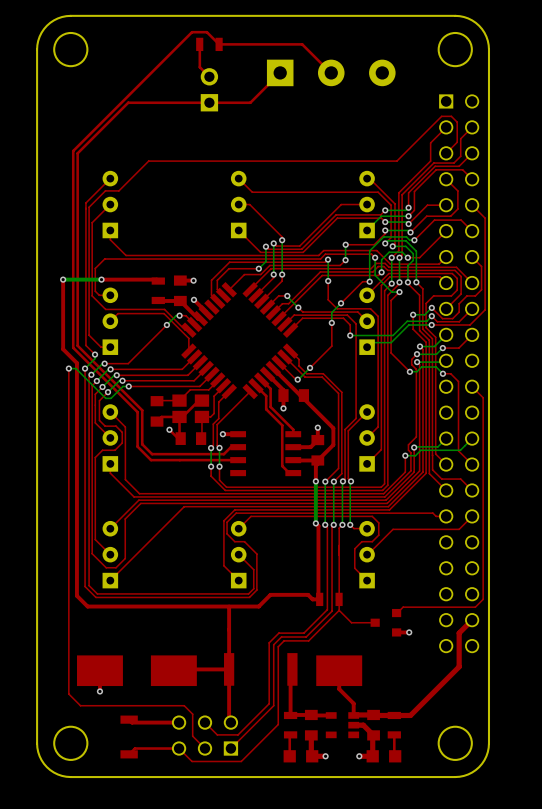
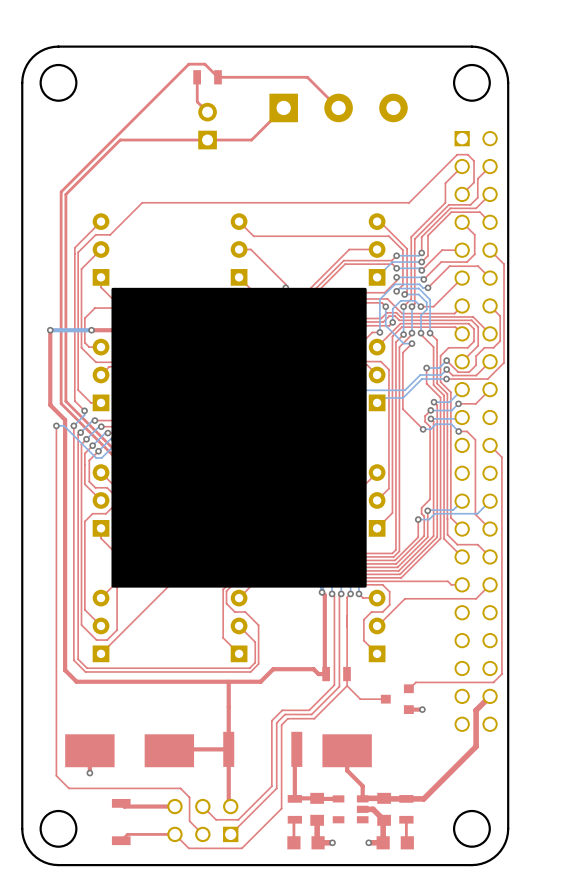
drawing: none -> [111, 287, 367, 588]

